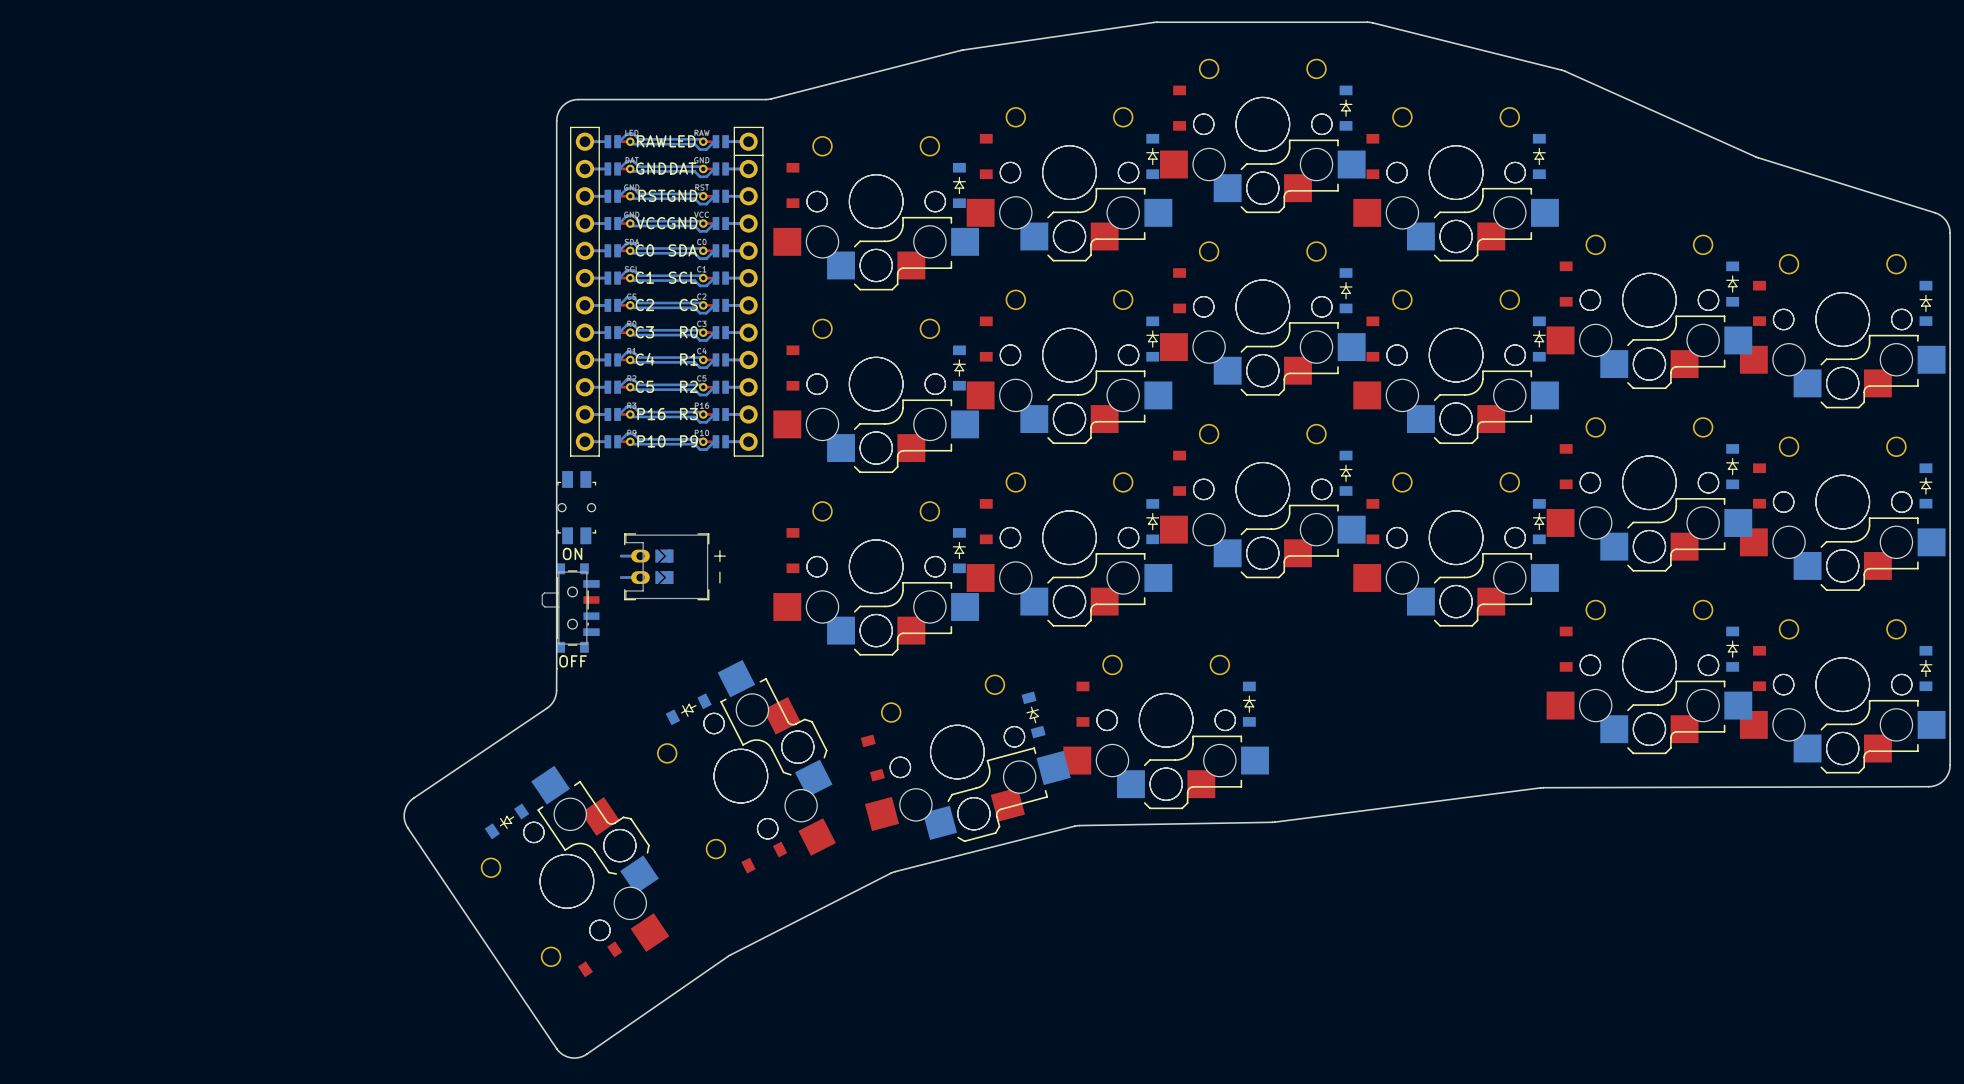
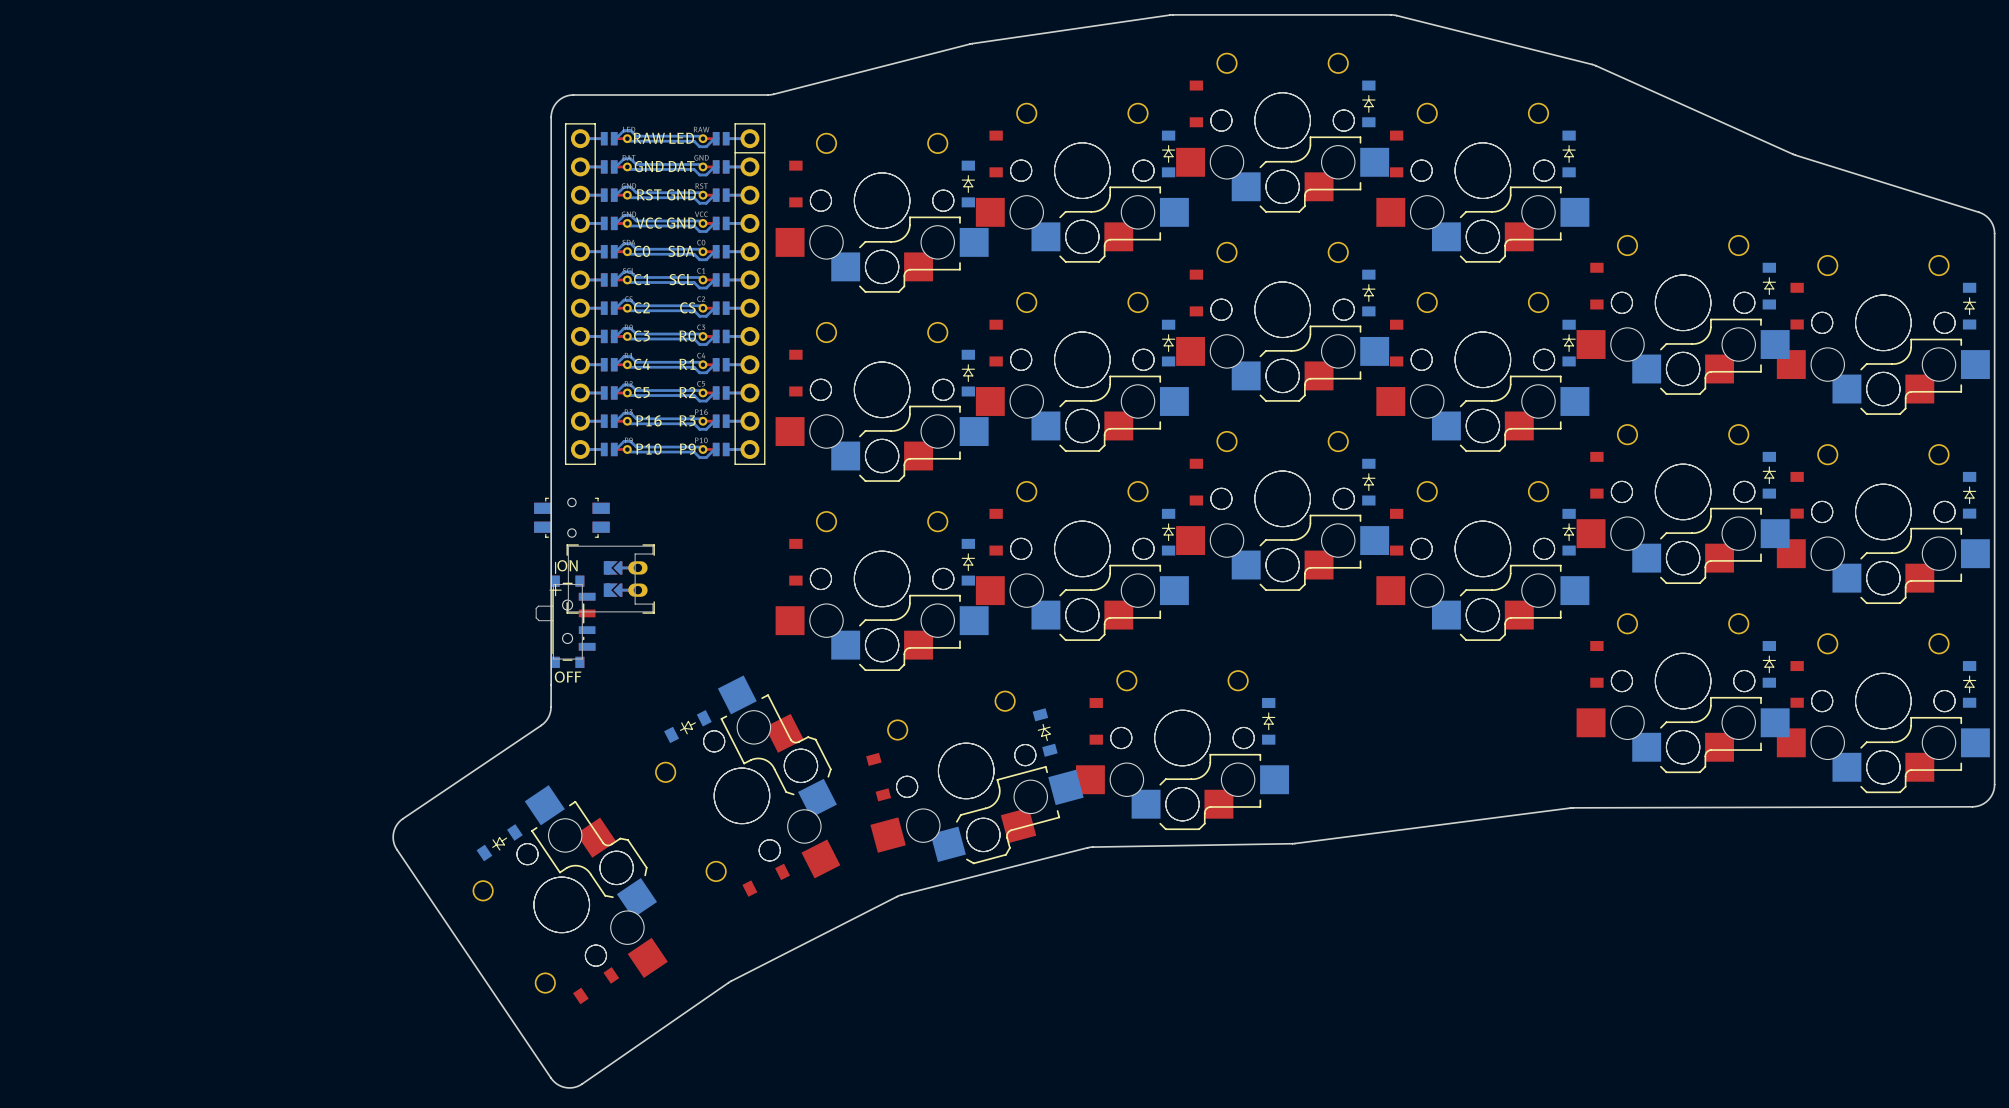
part rotation: 0° (576, 507) -> 90° clockwise (571, 517)
part rotation: 0° (674, 566) -> 180° (602, 579)
part position: (674, 566) -> (602, 579)

